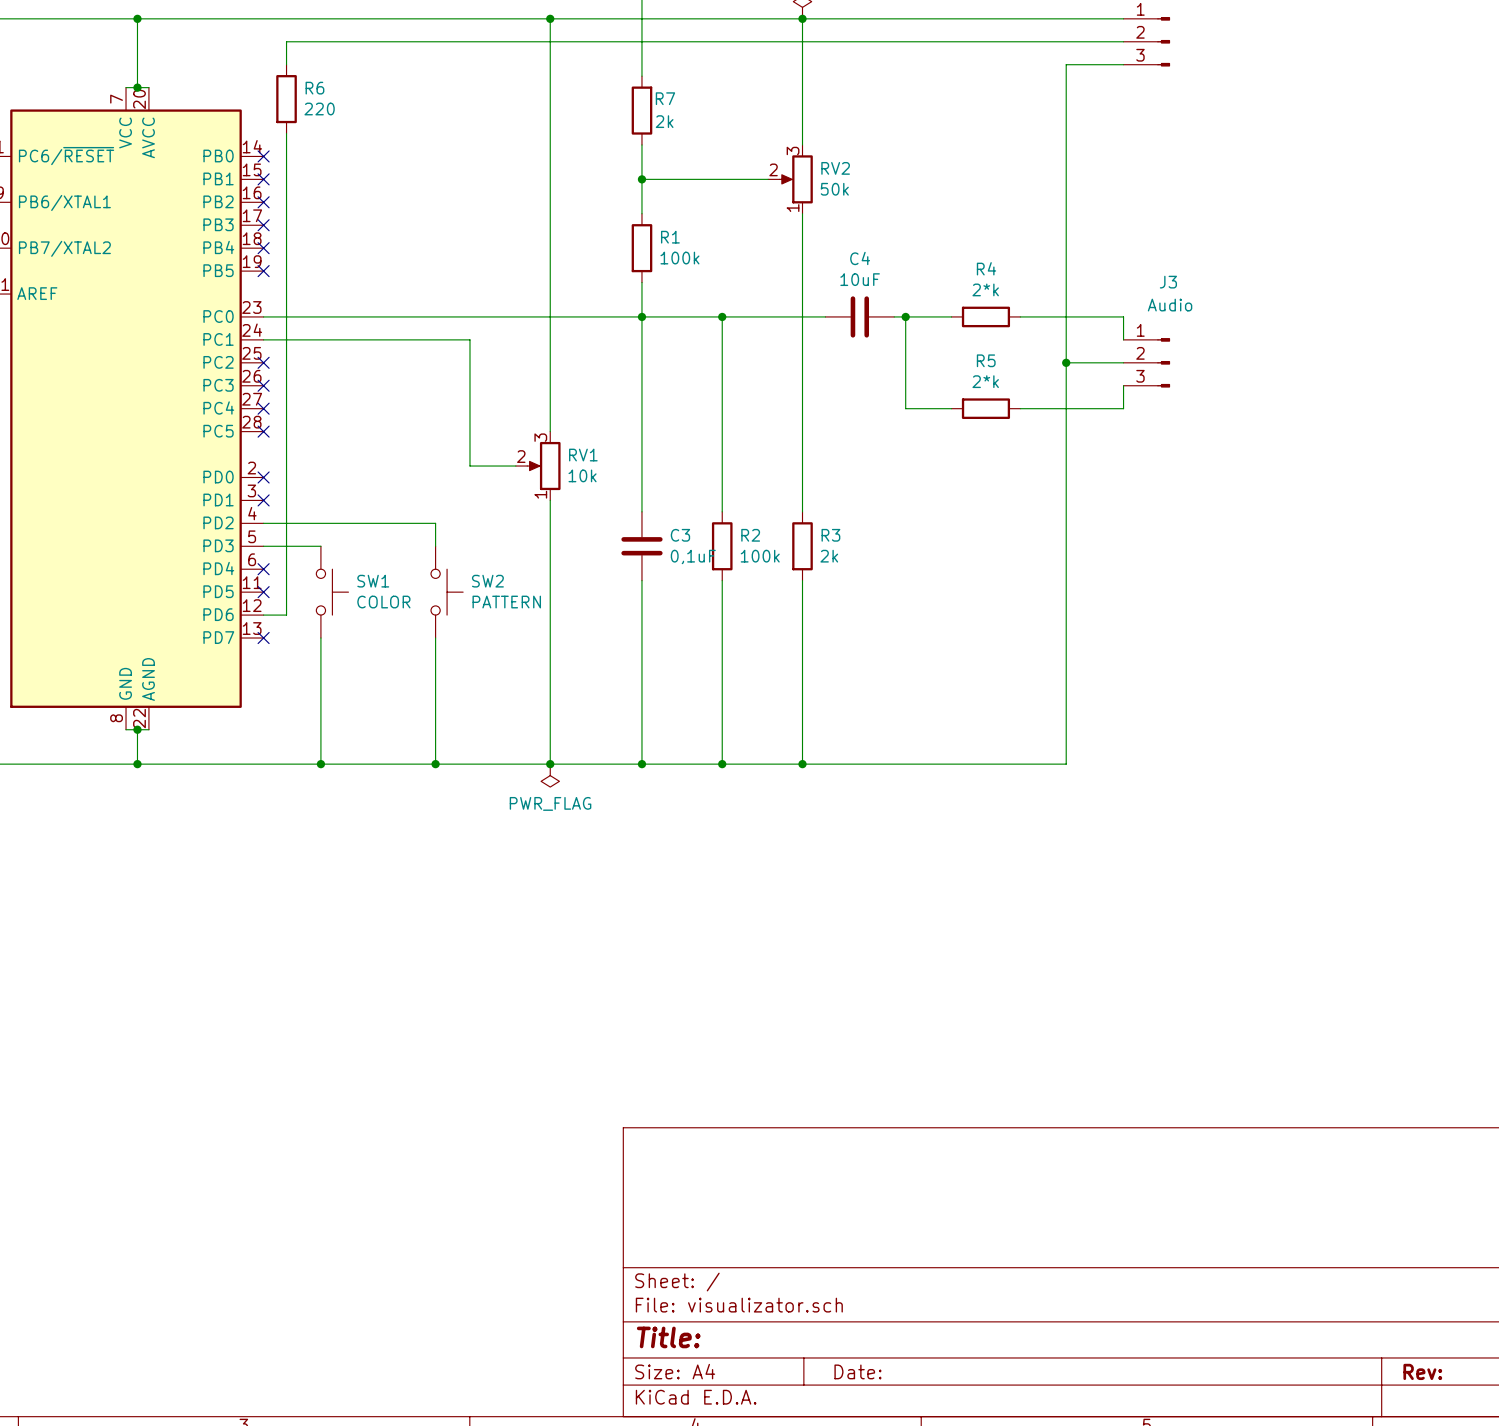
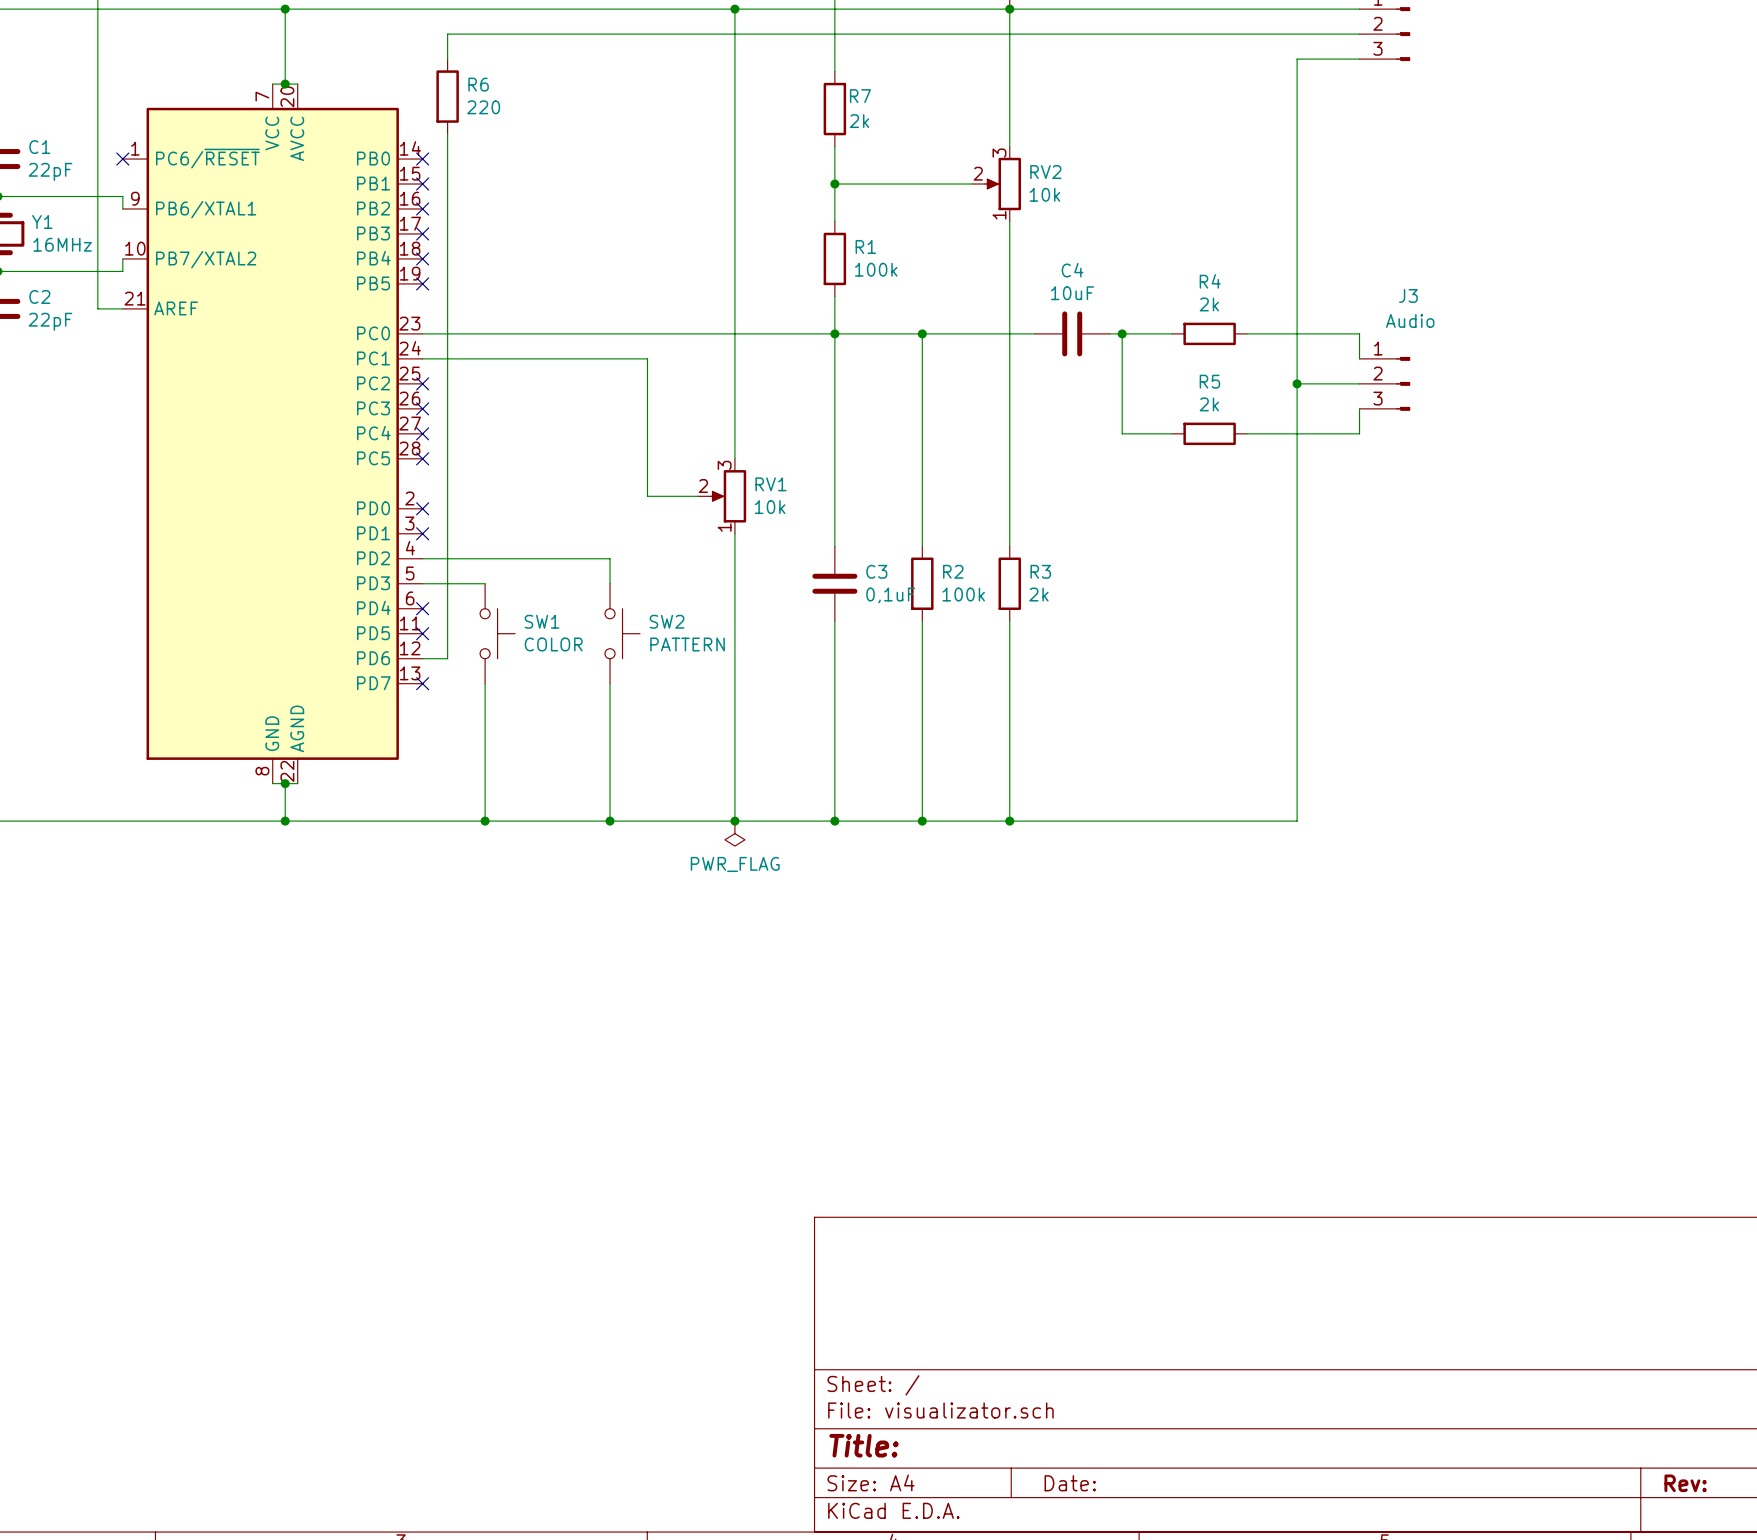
RV2 value: 50k (834, 189) -> 10k (1044, 194)
R4 value: 2*k (985, 289) -> 2k (1209, 304)
R5 value: 2*k (985, 381) -> 2k (1209, 404)

